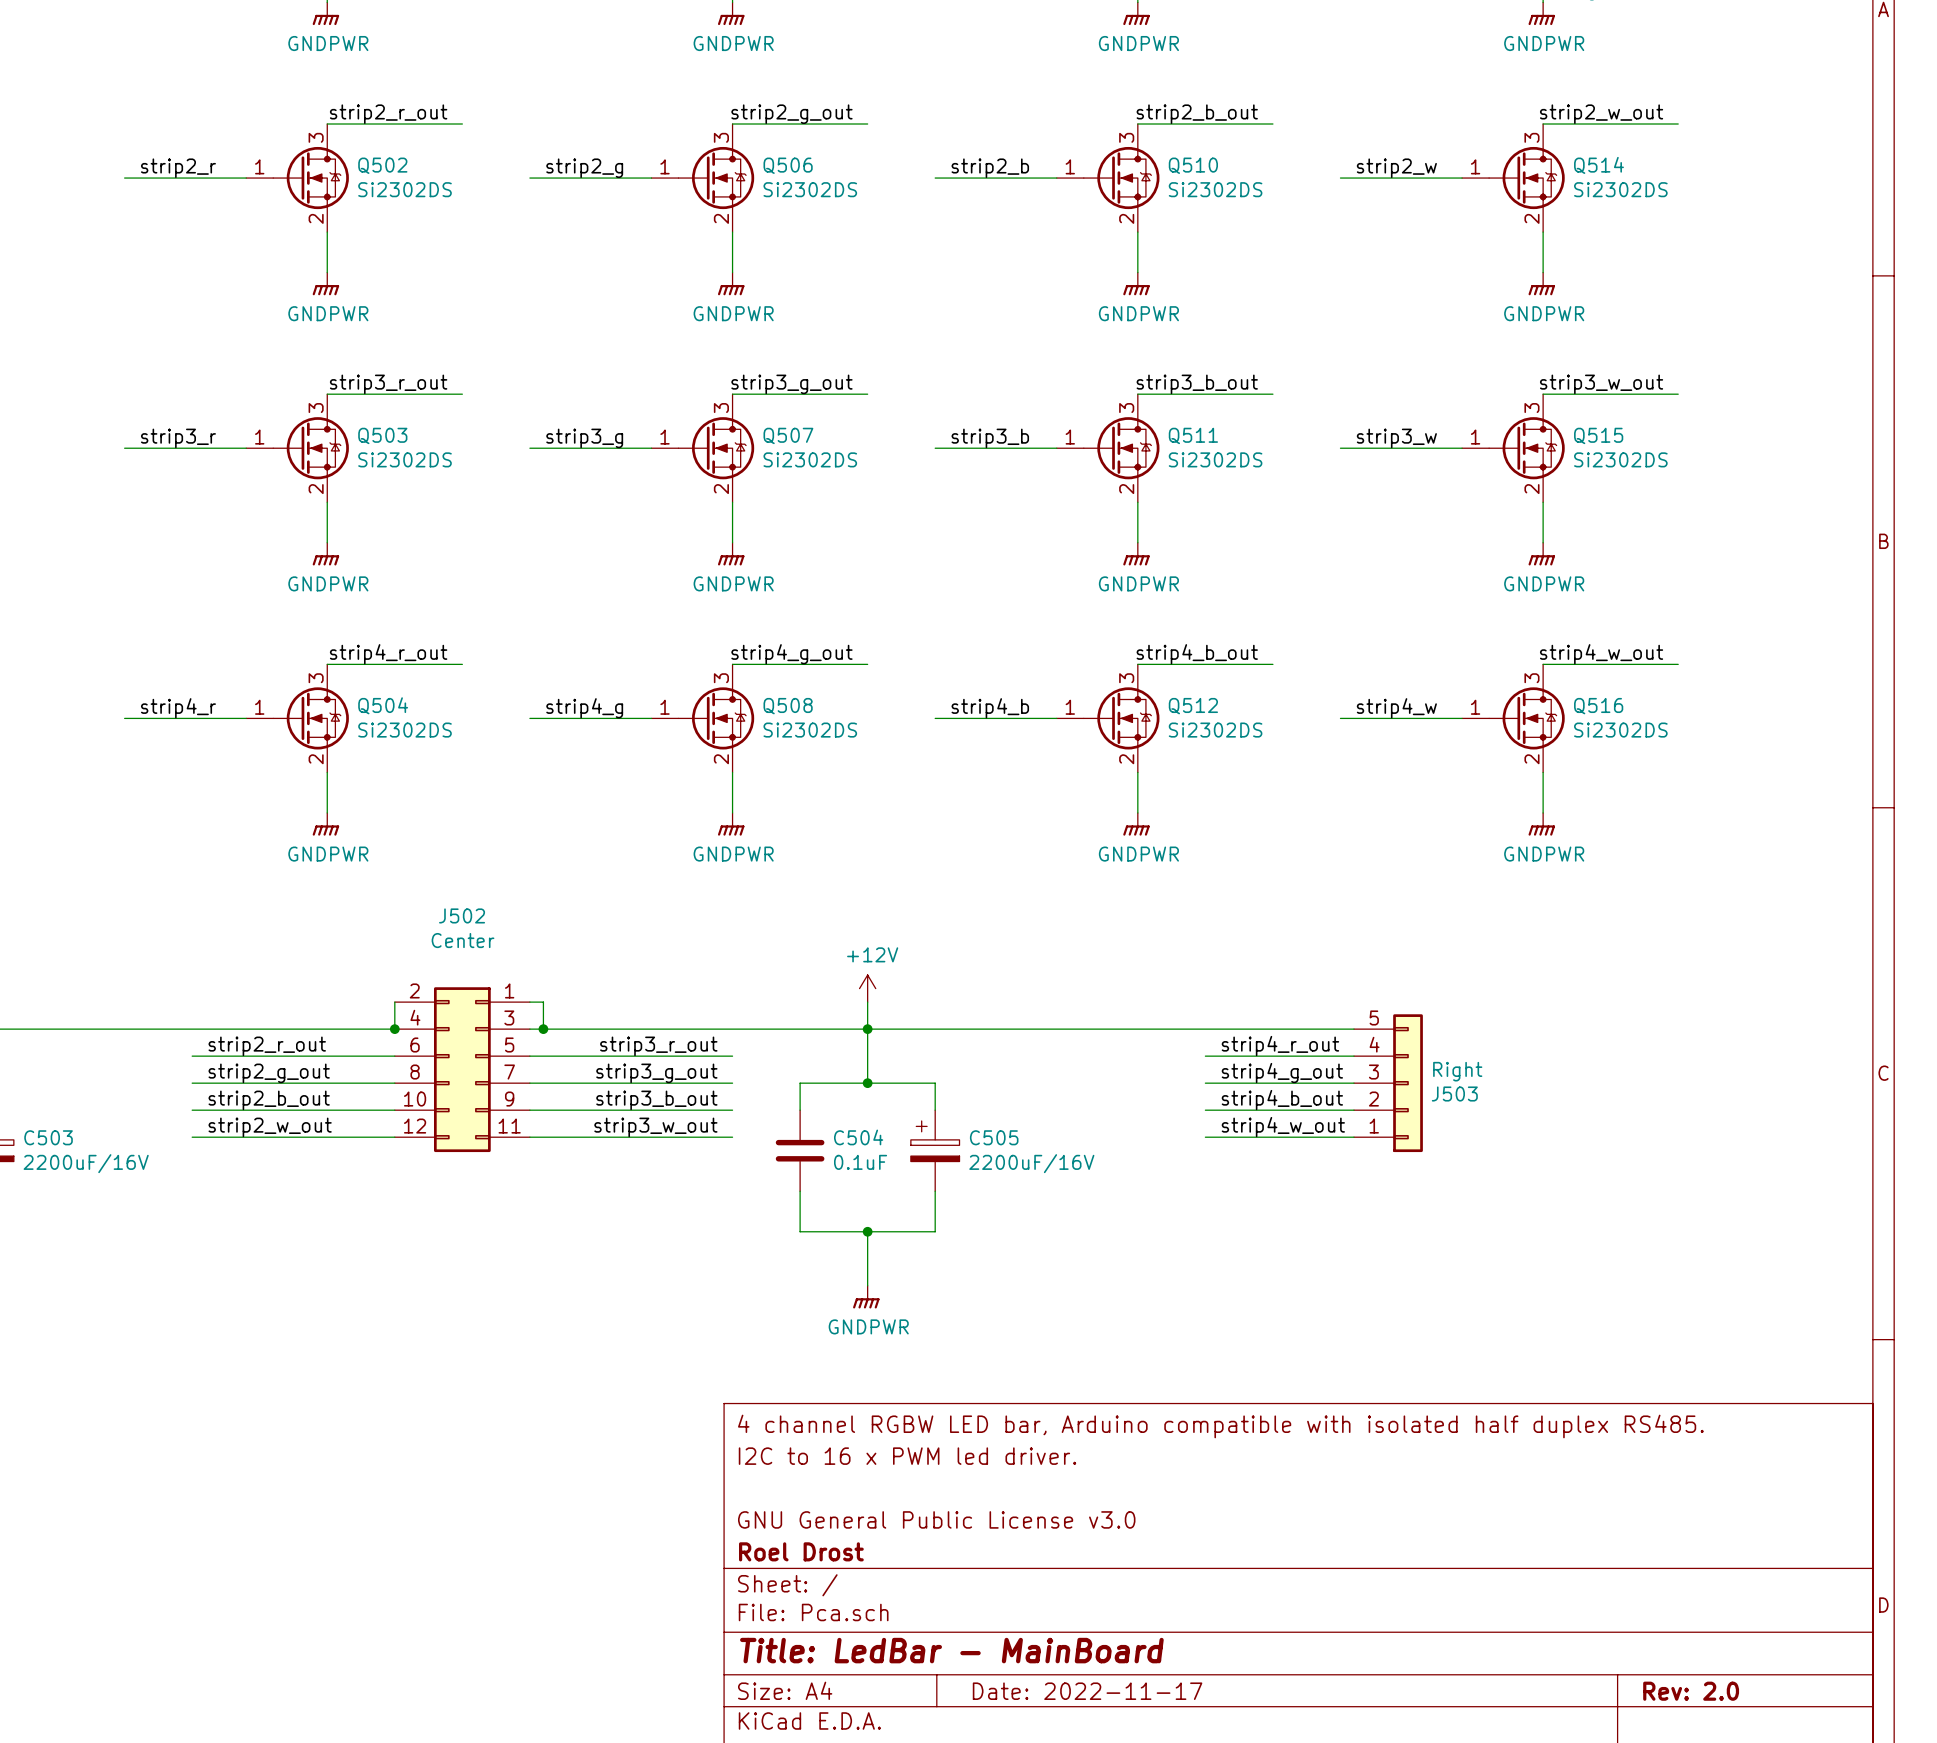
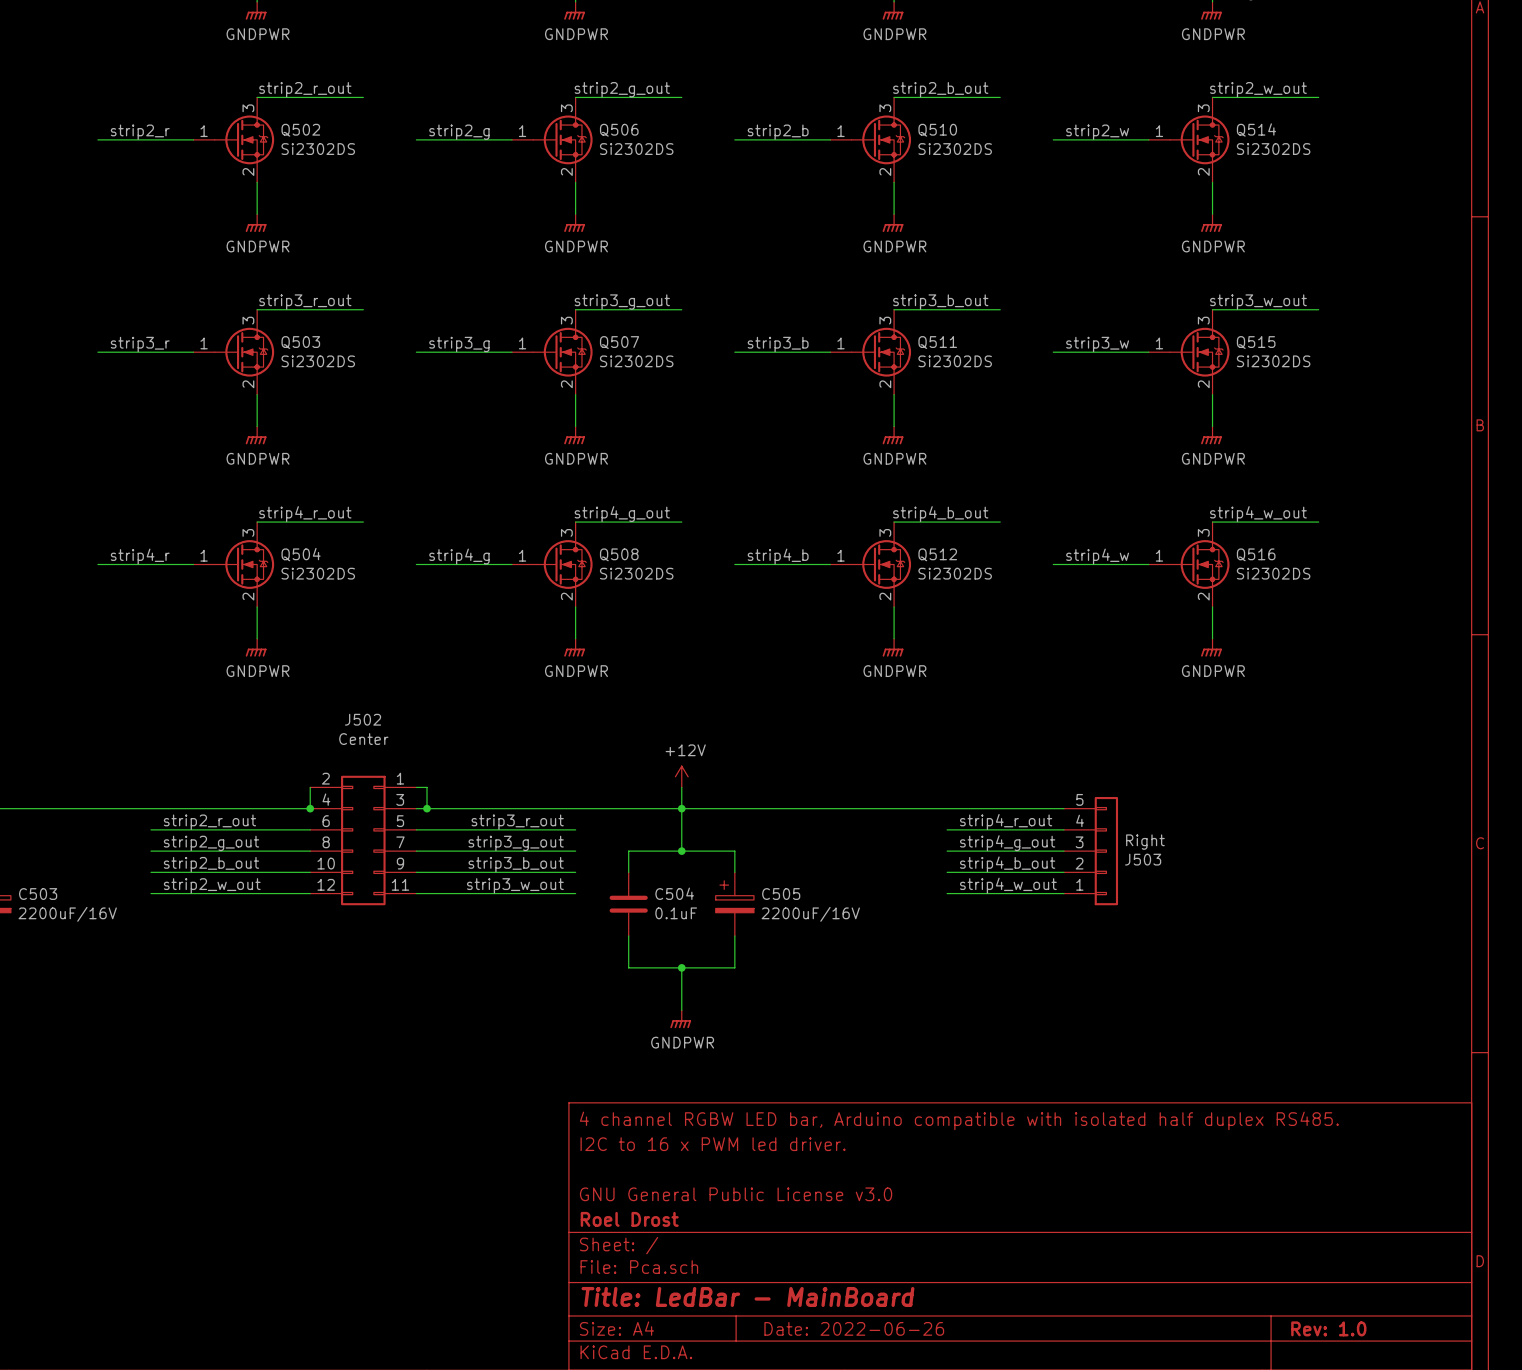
title block: Date: 2022-11-17 (1087, 1691) -> Date: 2022-06-26 (854, 1328)
title block: Rev: 2.0 (1691, 1691) -> Rev: 1.0 (1328, 1328)

